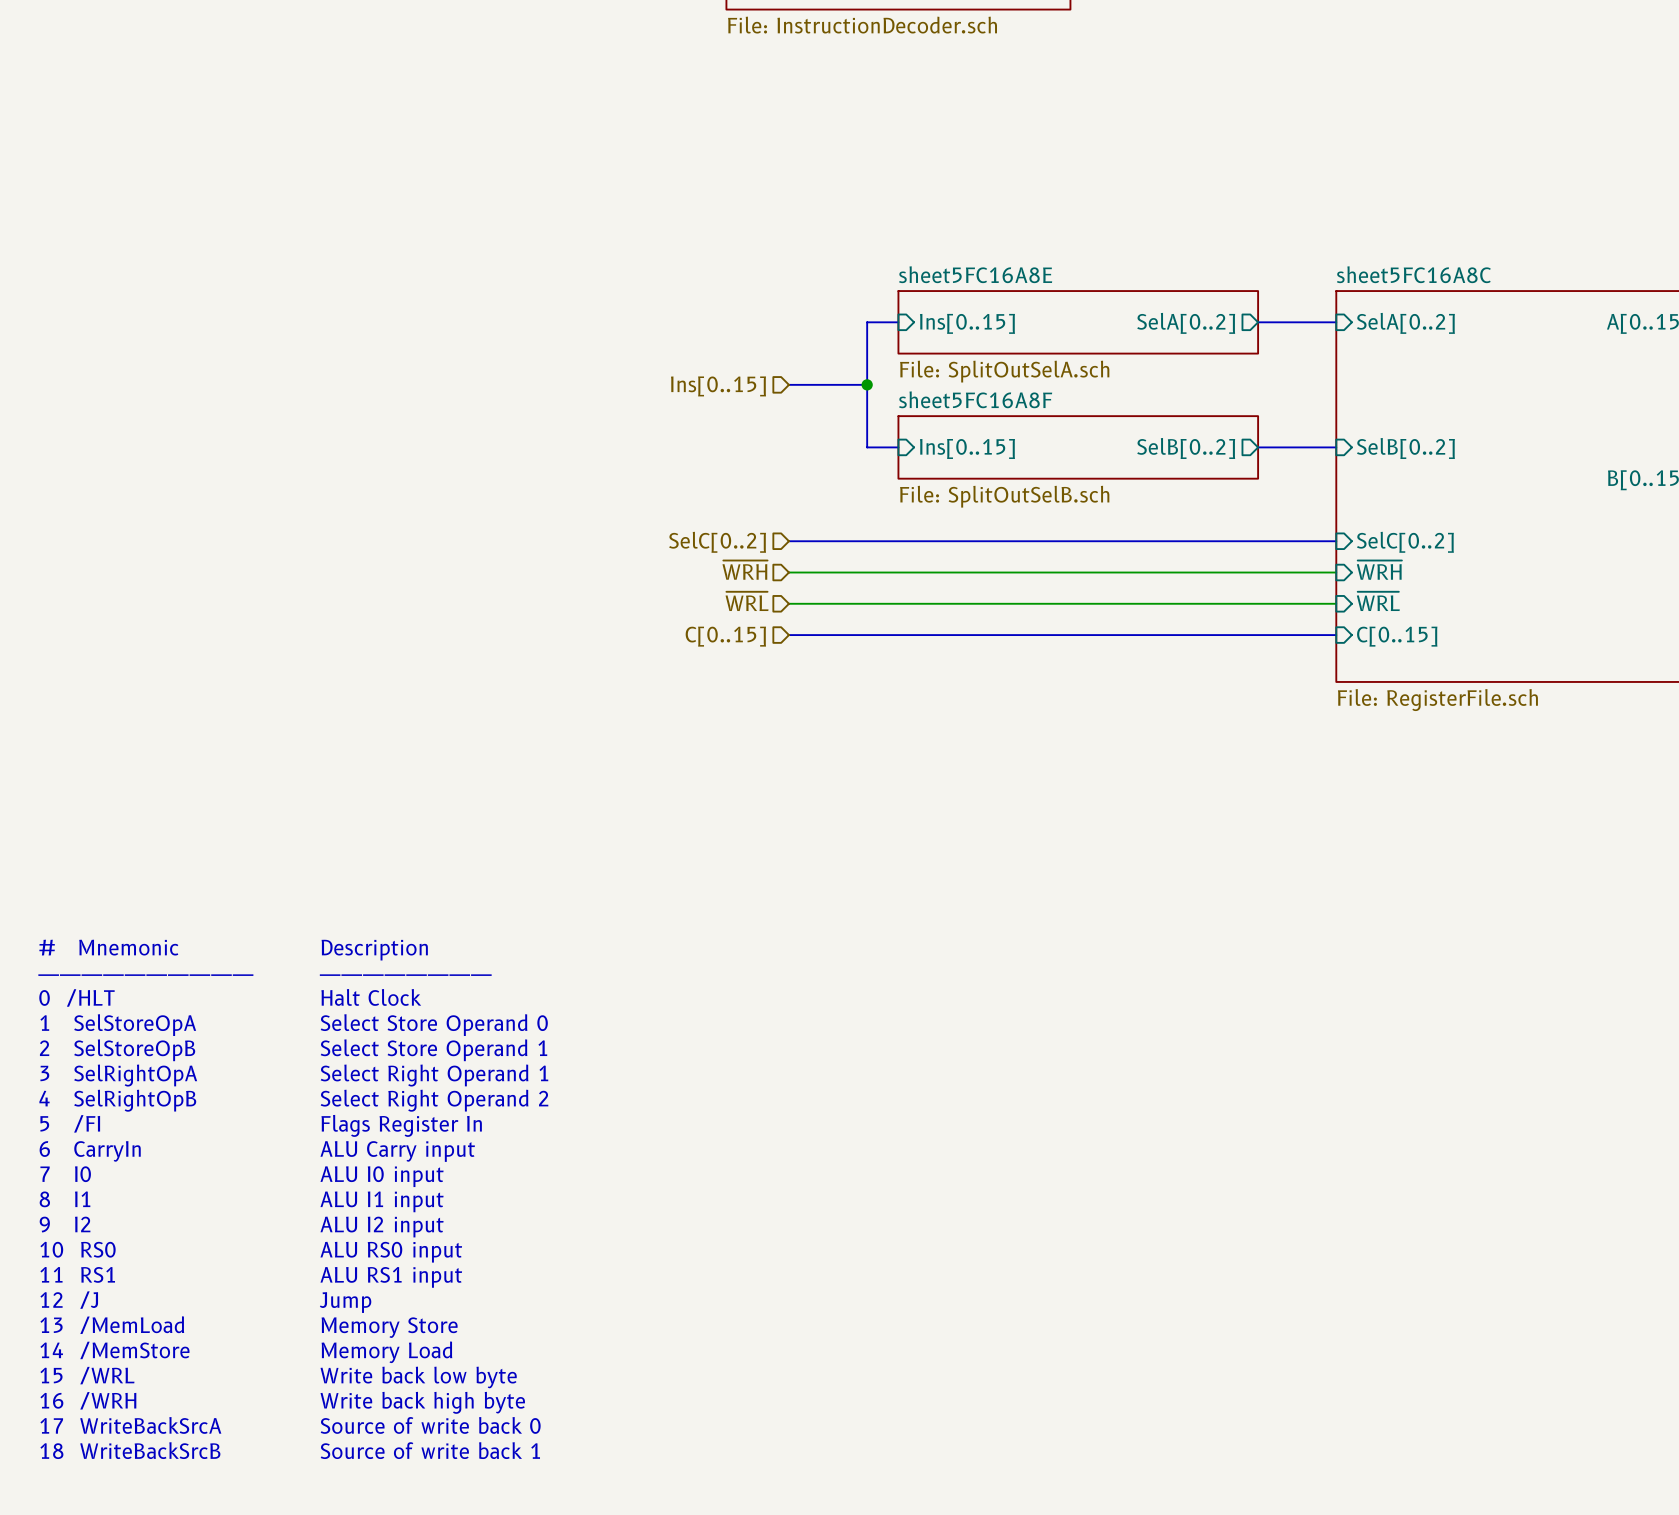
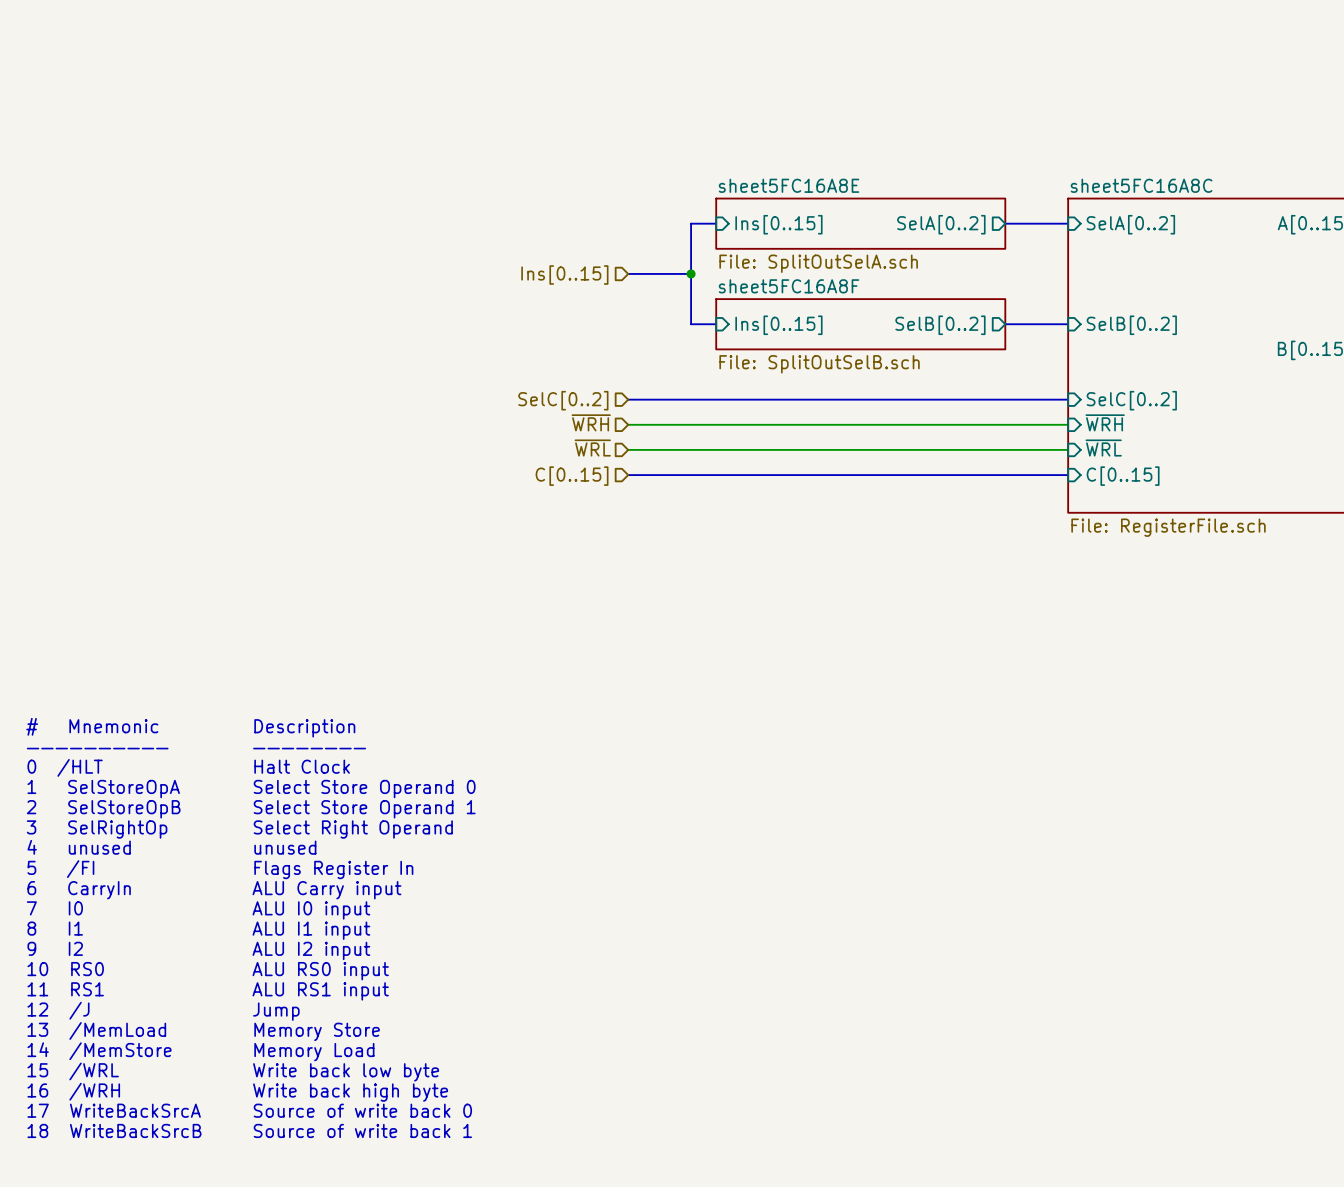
text: 3 SelRightOpA (118, 1075) -> 3 SelRightOp (97, 829)
text: Select Right Operand 1 (434, 1075) -> Select Right Operand (353, 829)
text: 4 SelRightOpB (117, 1100) -> 4 unused (79, 847)
text: Select Right Operand 2 (434, 1100) -> unused (285, 847)

